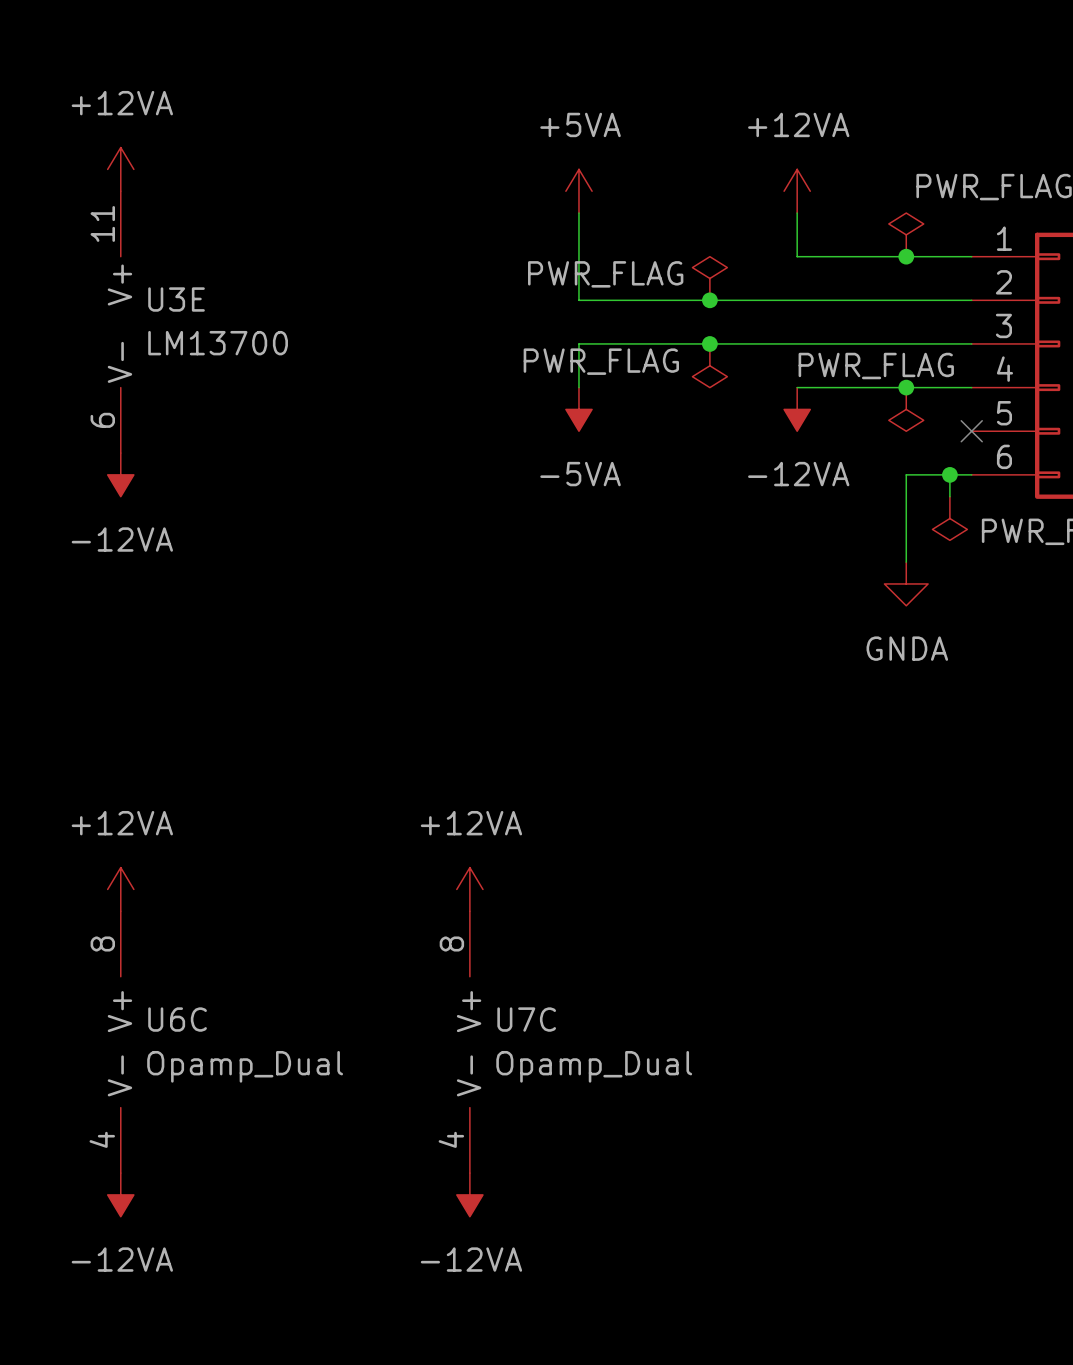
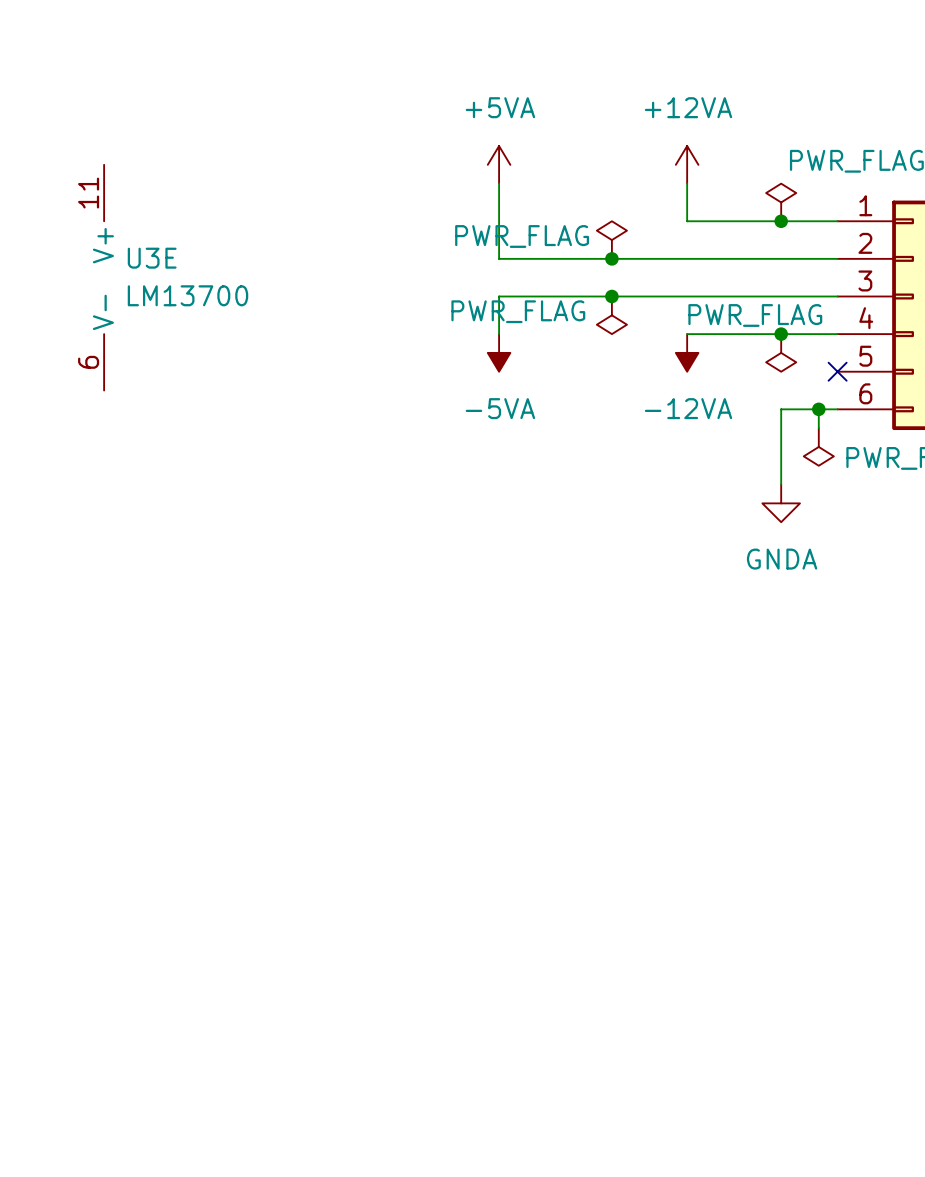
power symbol: +12VA (120, 169) -> none
power symbol: -12VA (120, 474) -> none
power symbol: +12VA (120, 889) -> none
power symbol: +12VA (469, 889) -> none
U6C: Opamp_Dual (120, 1042) -> none
U7C: Opamp_Dual (469, 1042) -> none
power symbol: -12VA (120, 1194) -> none
power symbol: -12VA (469, 1194) -> none

